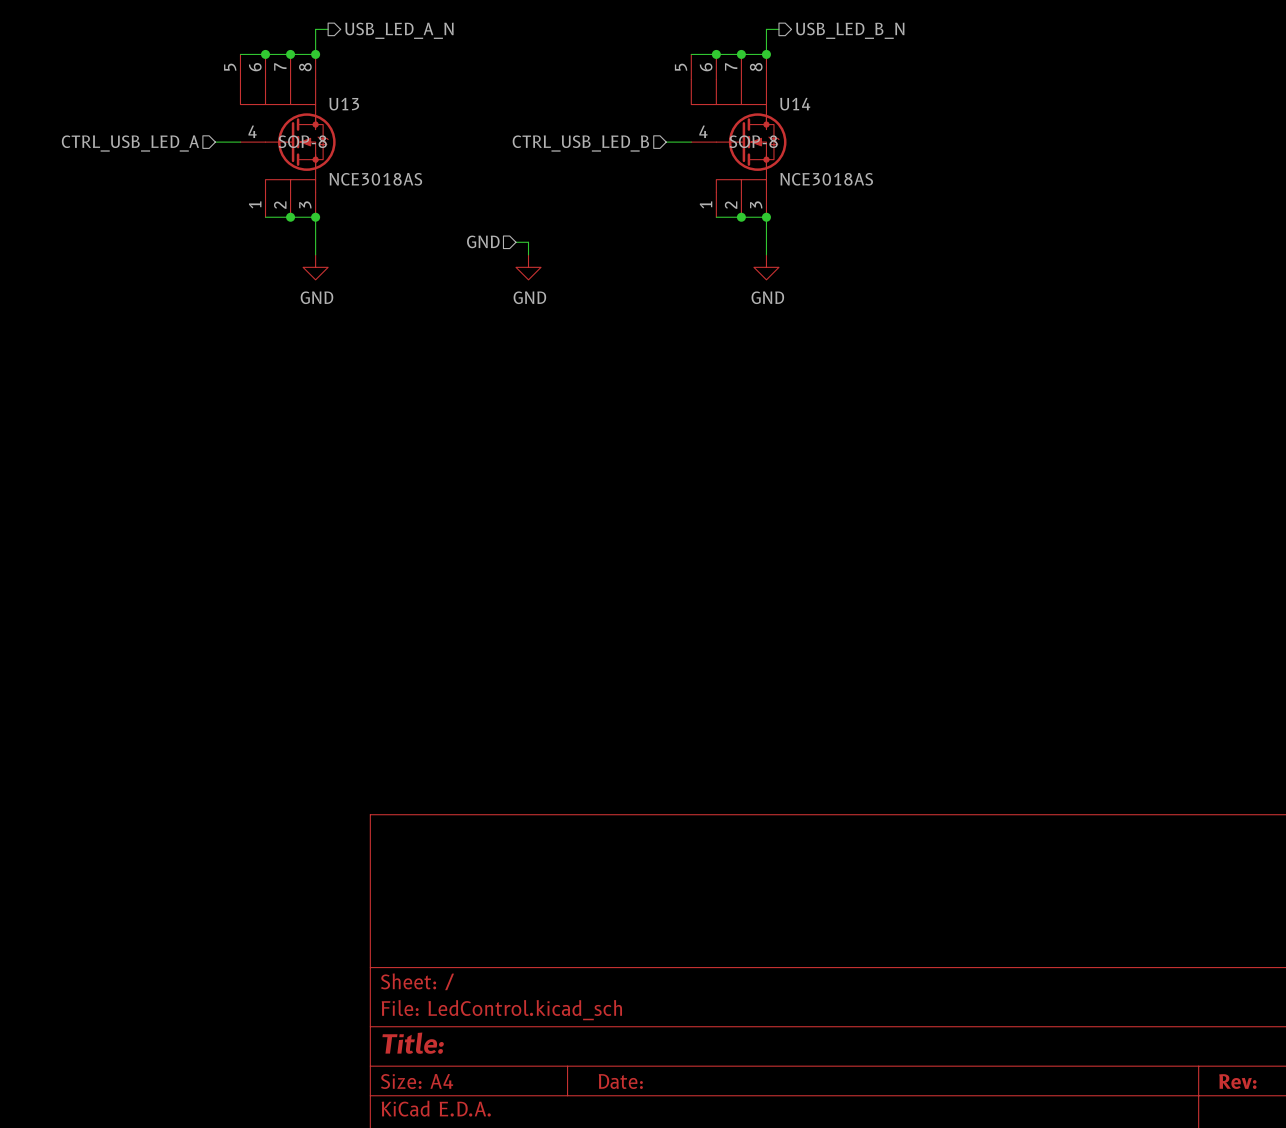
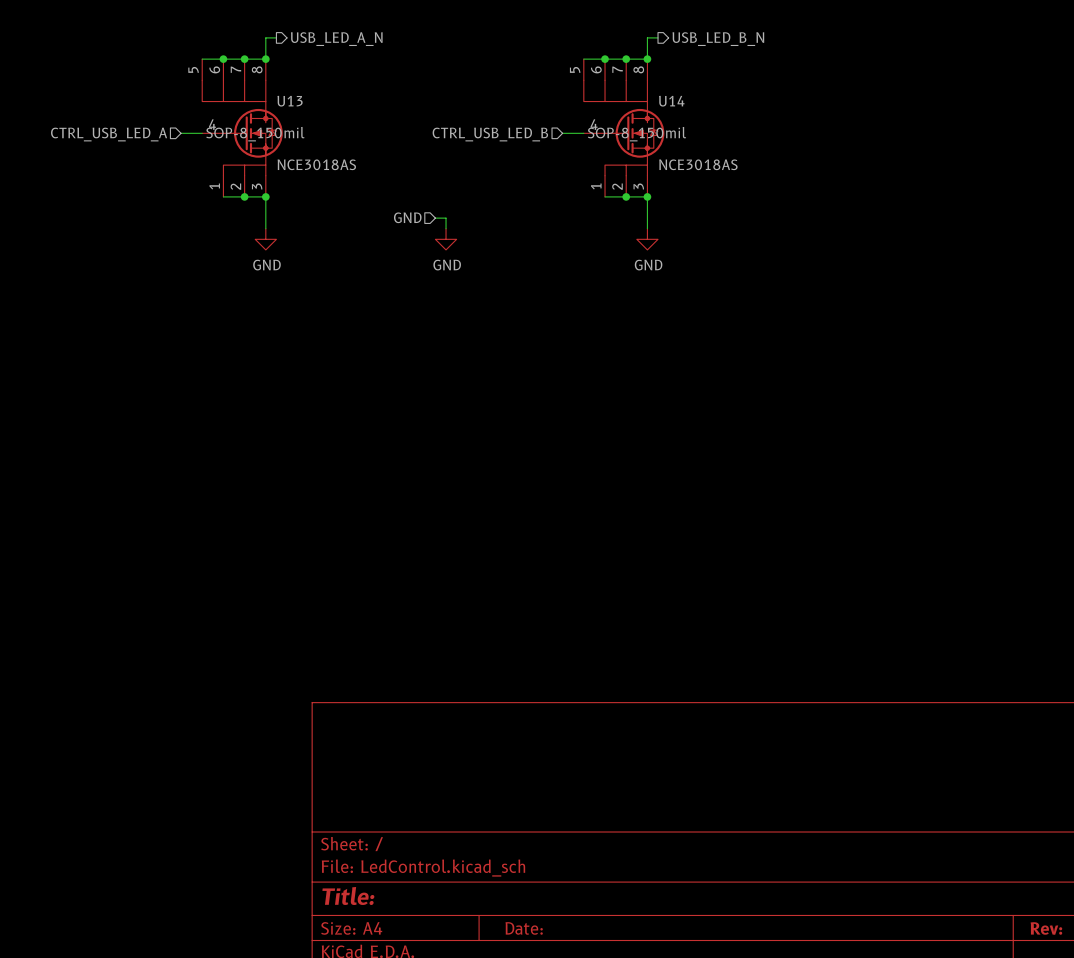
U13 text: SOP-8 (302, 141) -> SOP-8_150mil (255, 134)
U14 text: SOP-8 (753, 141) -> SOP-8_150mil (637, 134)

